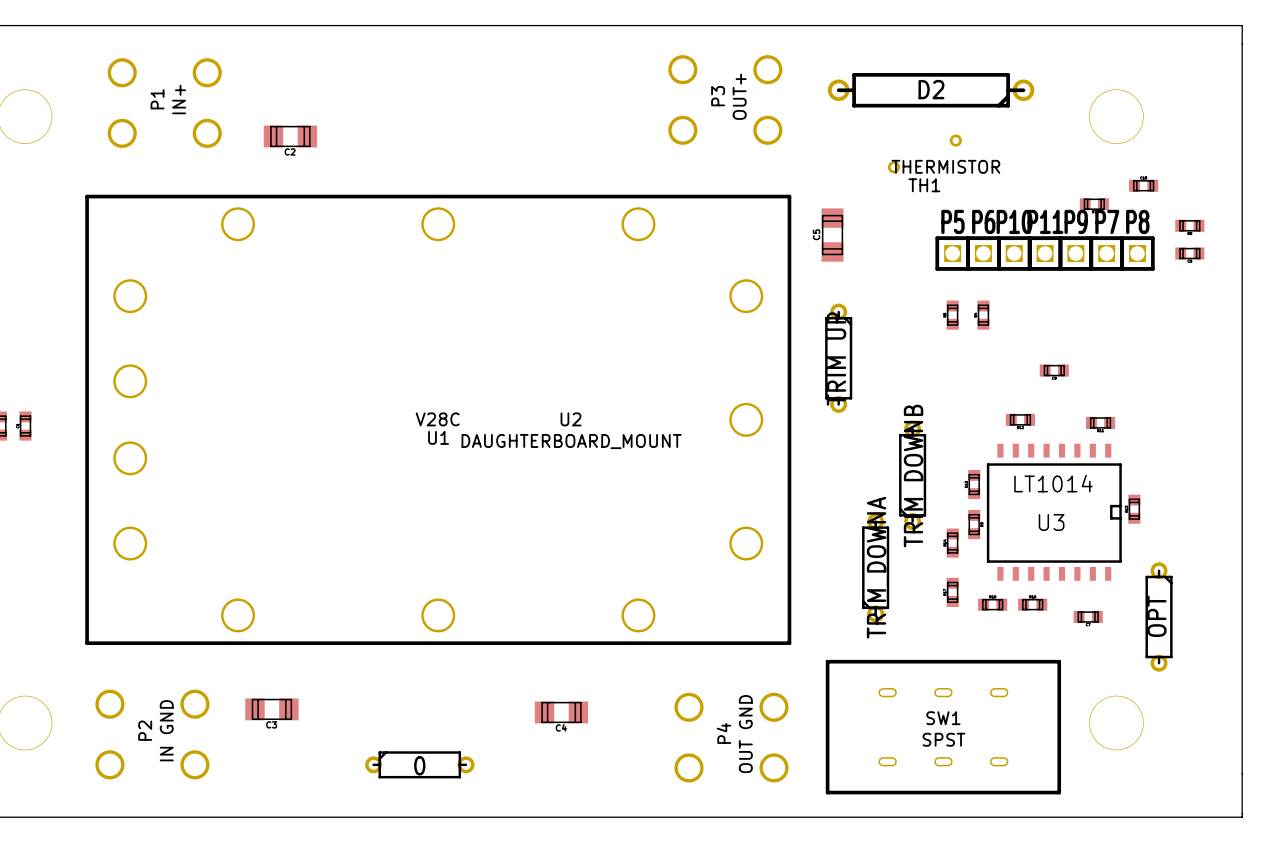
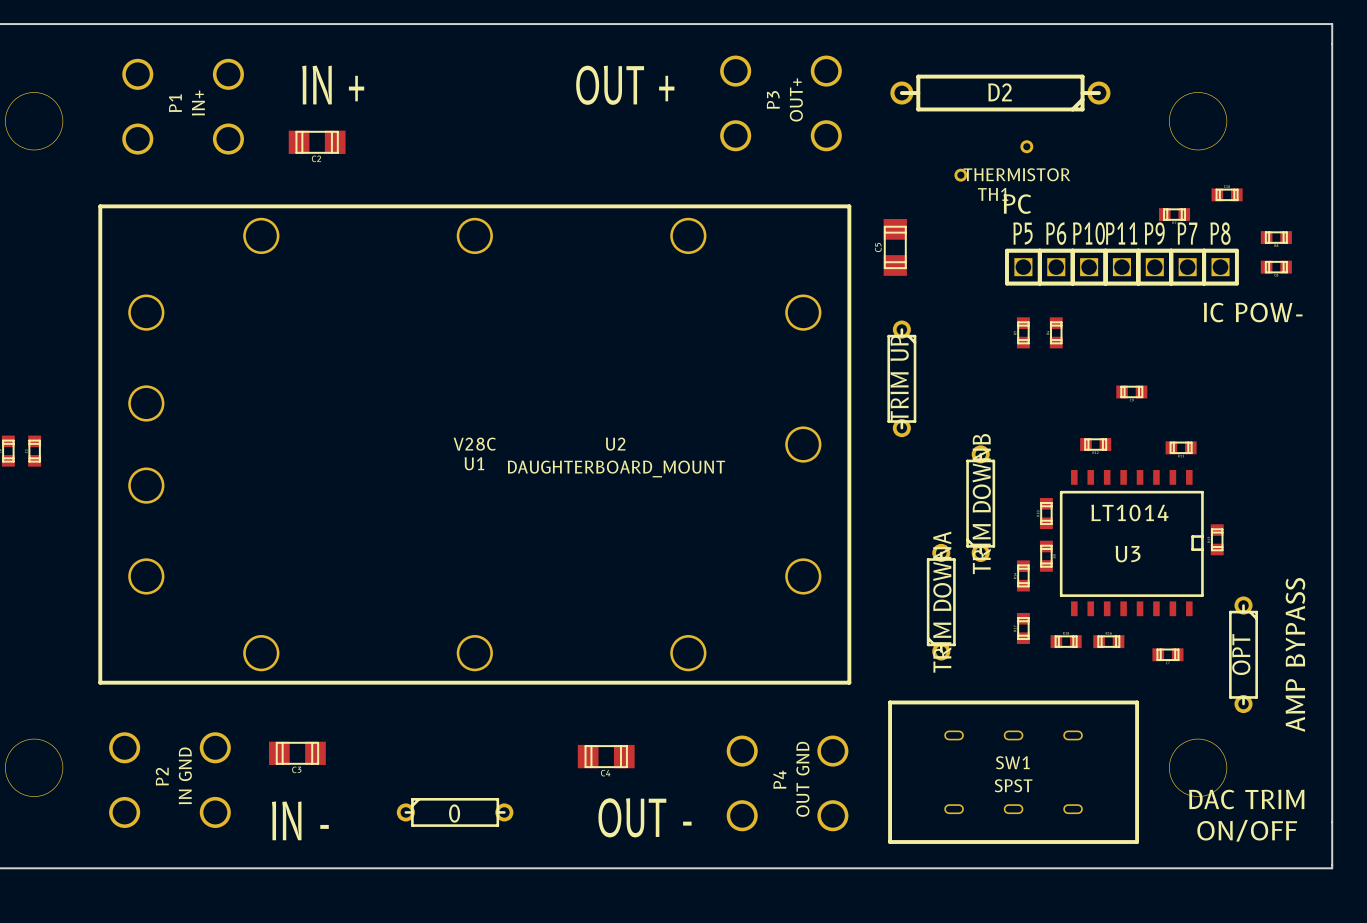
text: none -> IN + (333, 85)
text: none -> OUT + (625, 85)
text: none -> PC (1017, 204)
text: none -> IC POW- (1253, 312)
text: none -> AMP BYPASS (1295, 654)
text: none -> DAC TRIM (1246, 799)
text: none -> OUT - (644, 817)
text: none -> IN - (300, 820)
text: none -> ON/OFF (1247, 830)

